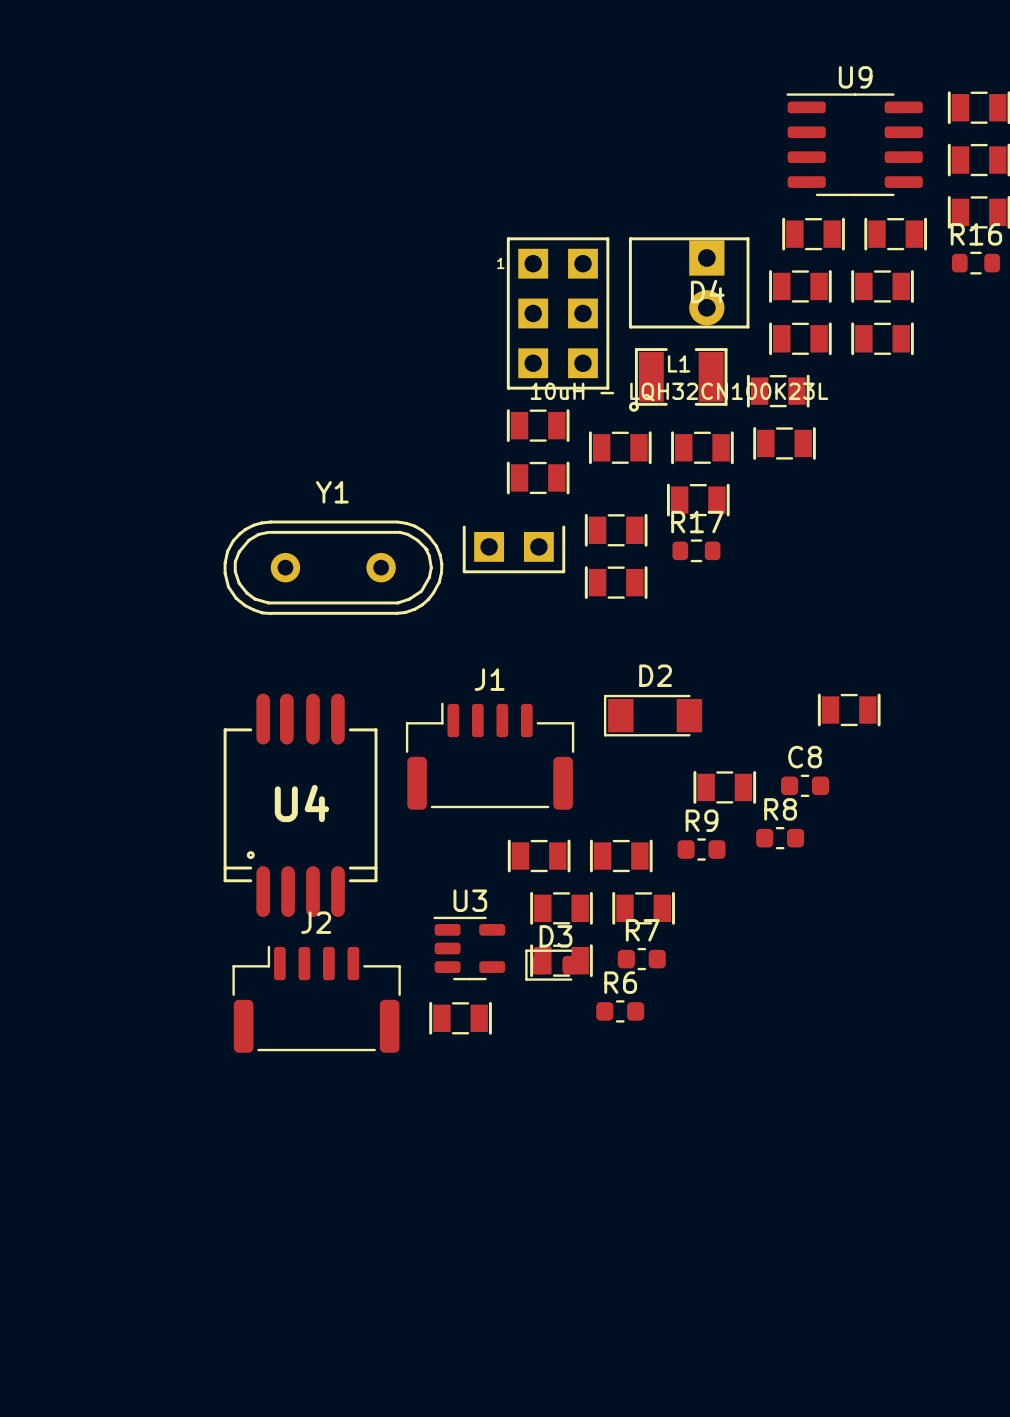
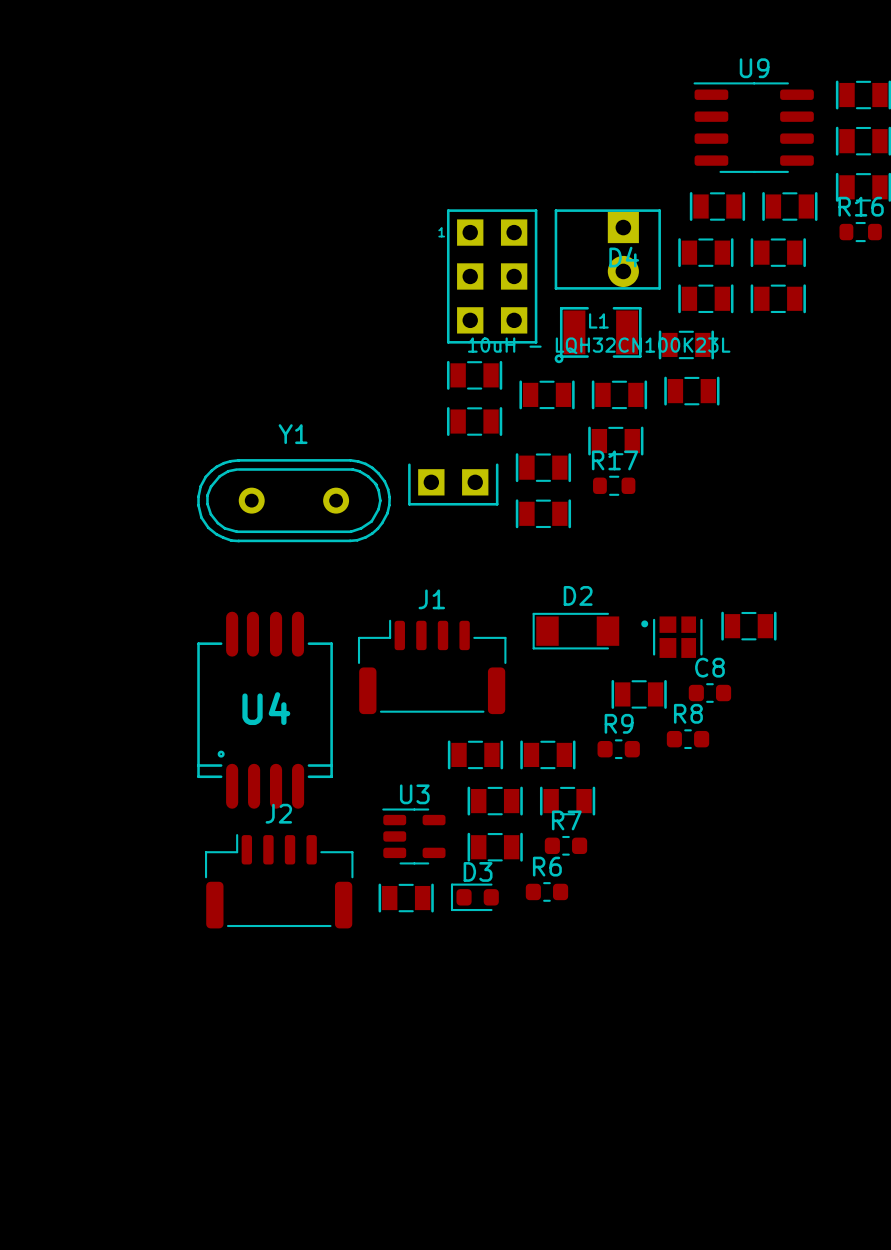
part: none -> (671, 637)
D3 position: (552, 965) -> (474, 897)

